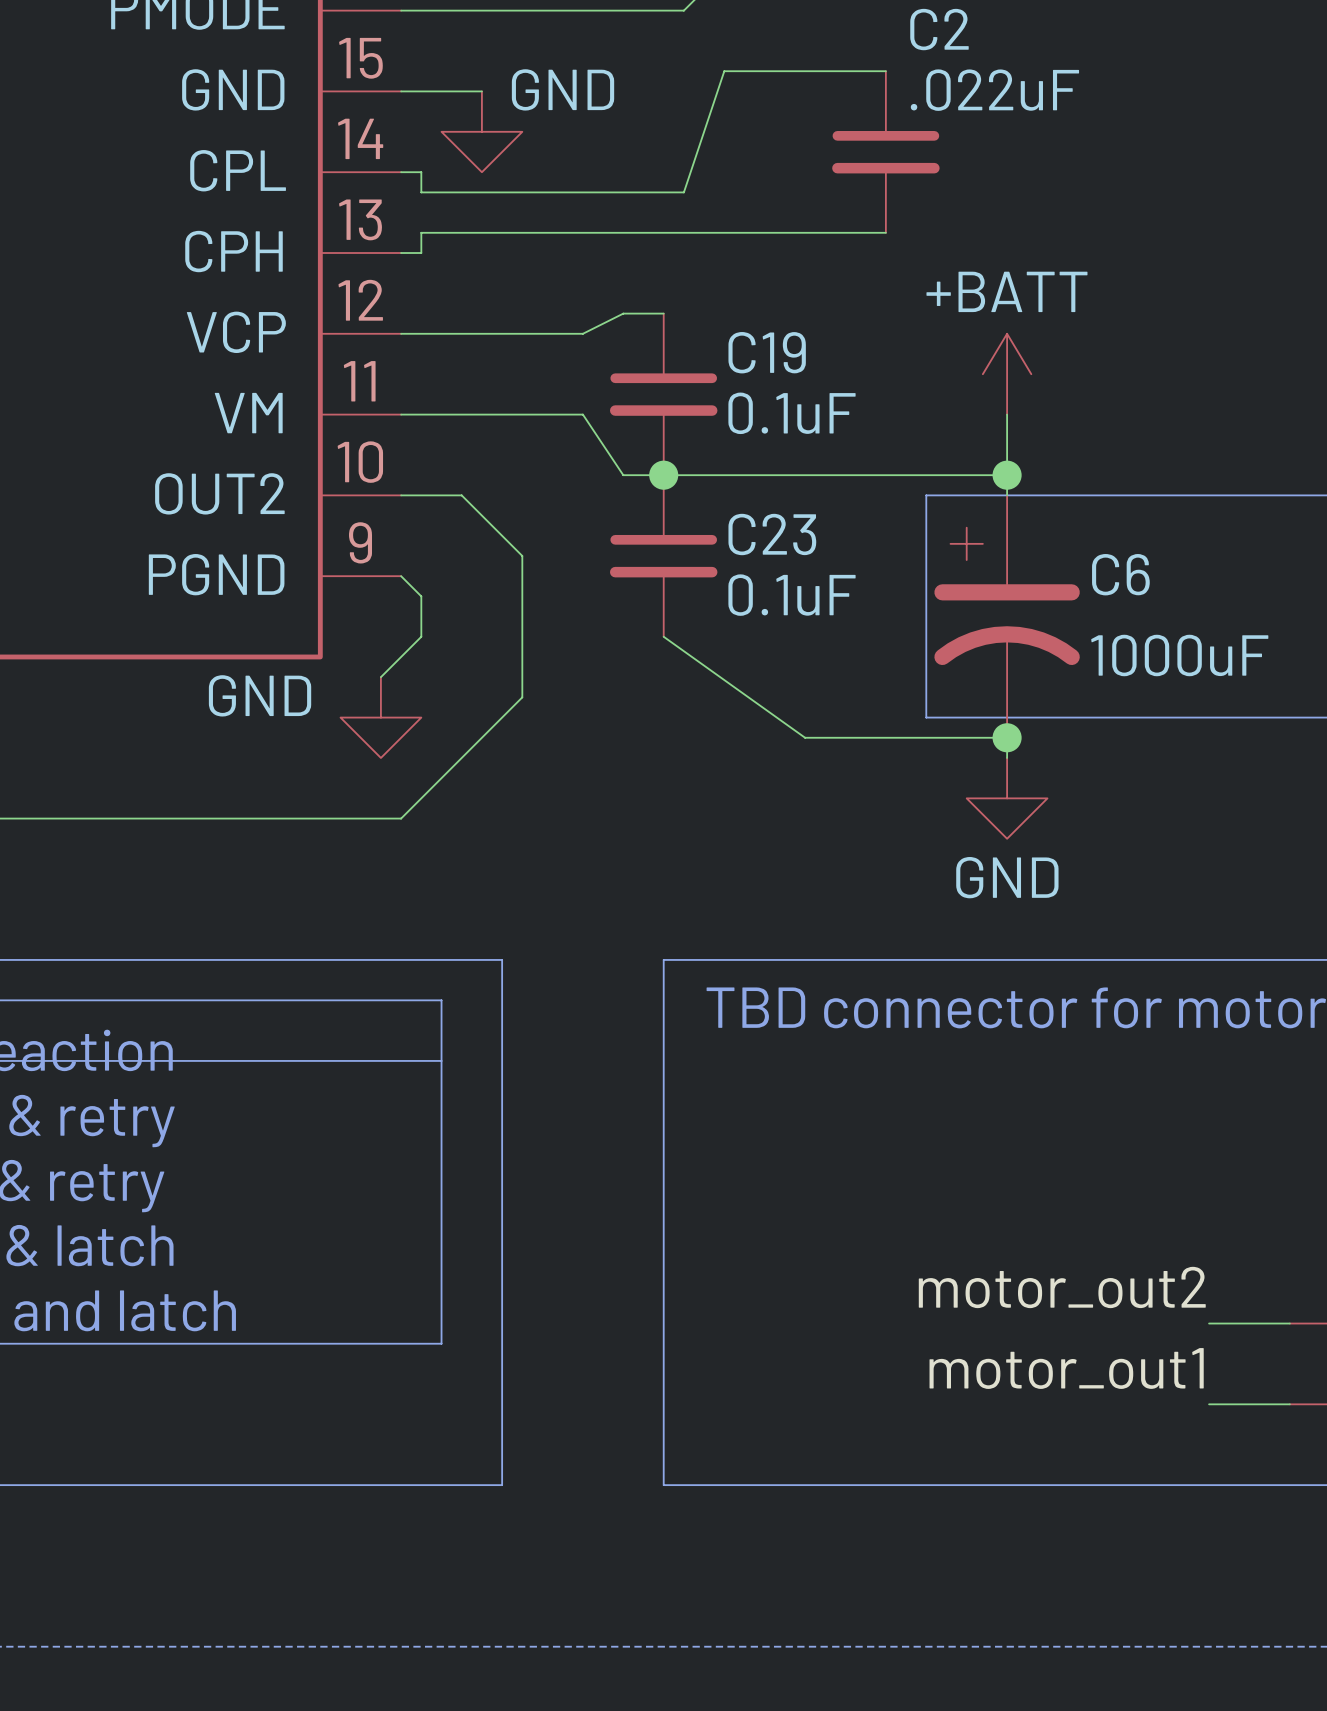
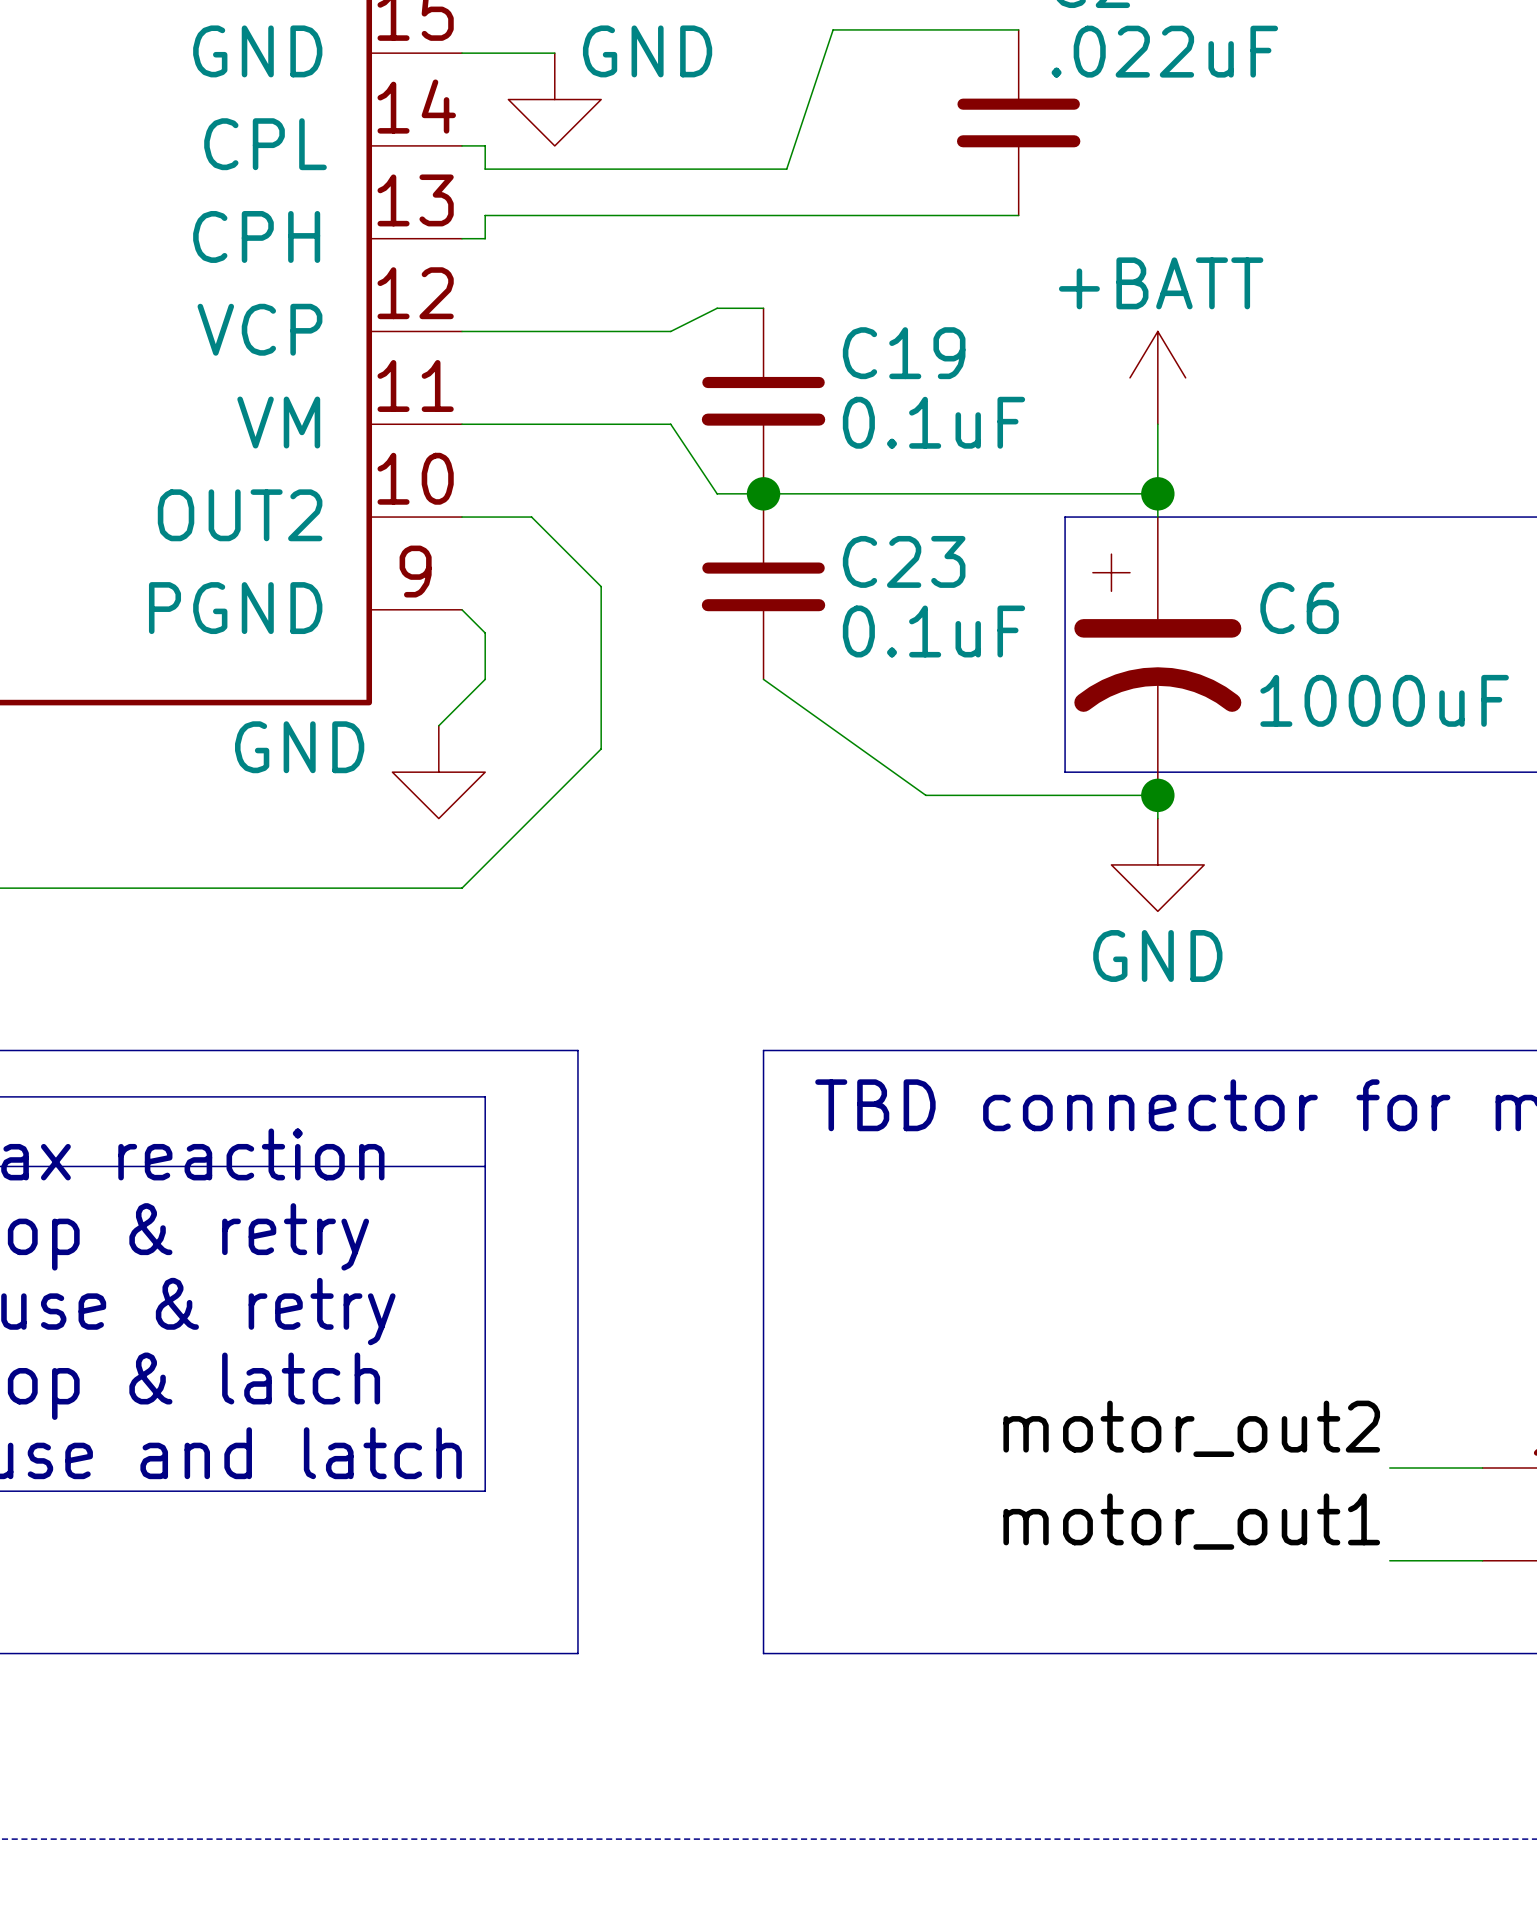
line: (421, 1000) (441, 1000) (441, 1343) (421, 1343) -> (485, 1096) (485, 1491)
line: (421, 1060) (441, 1060) -> none

